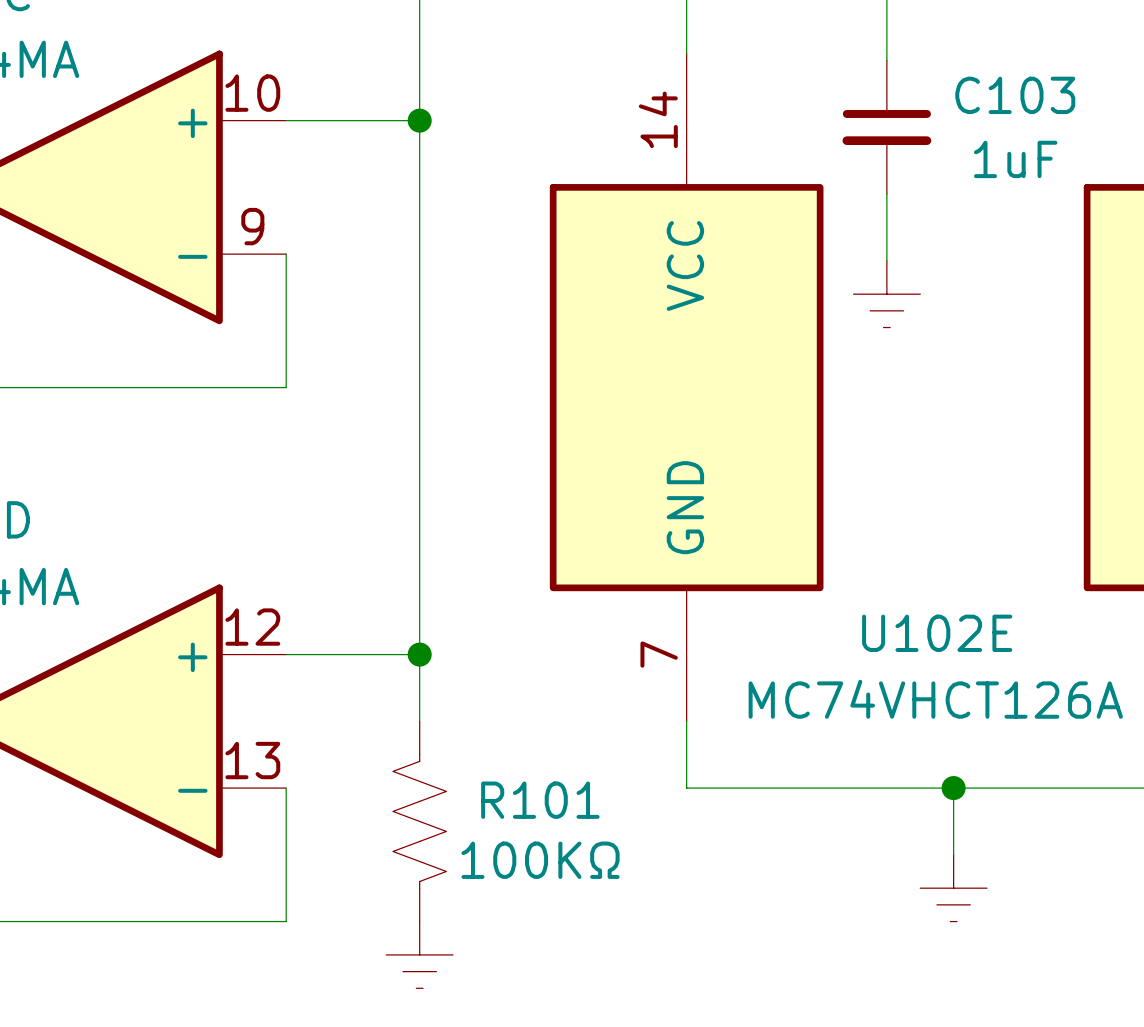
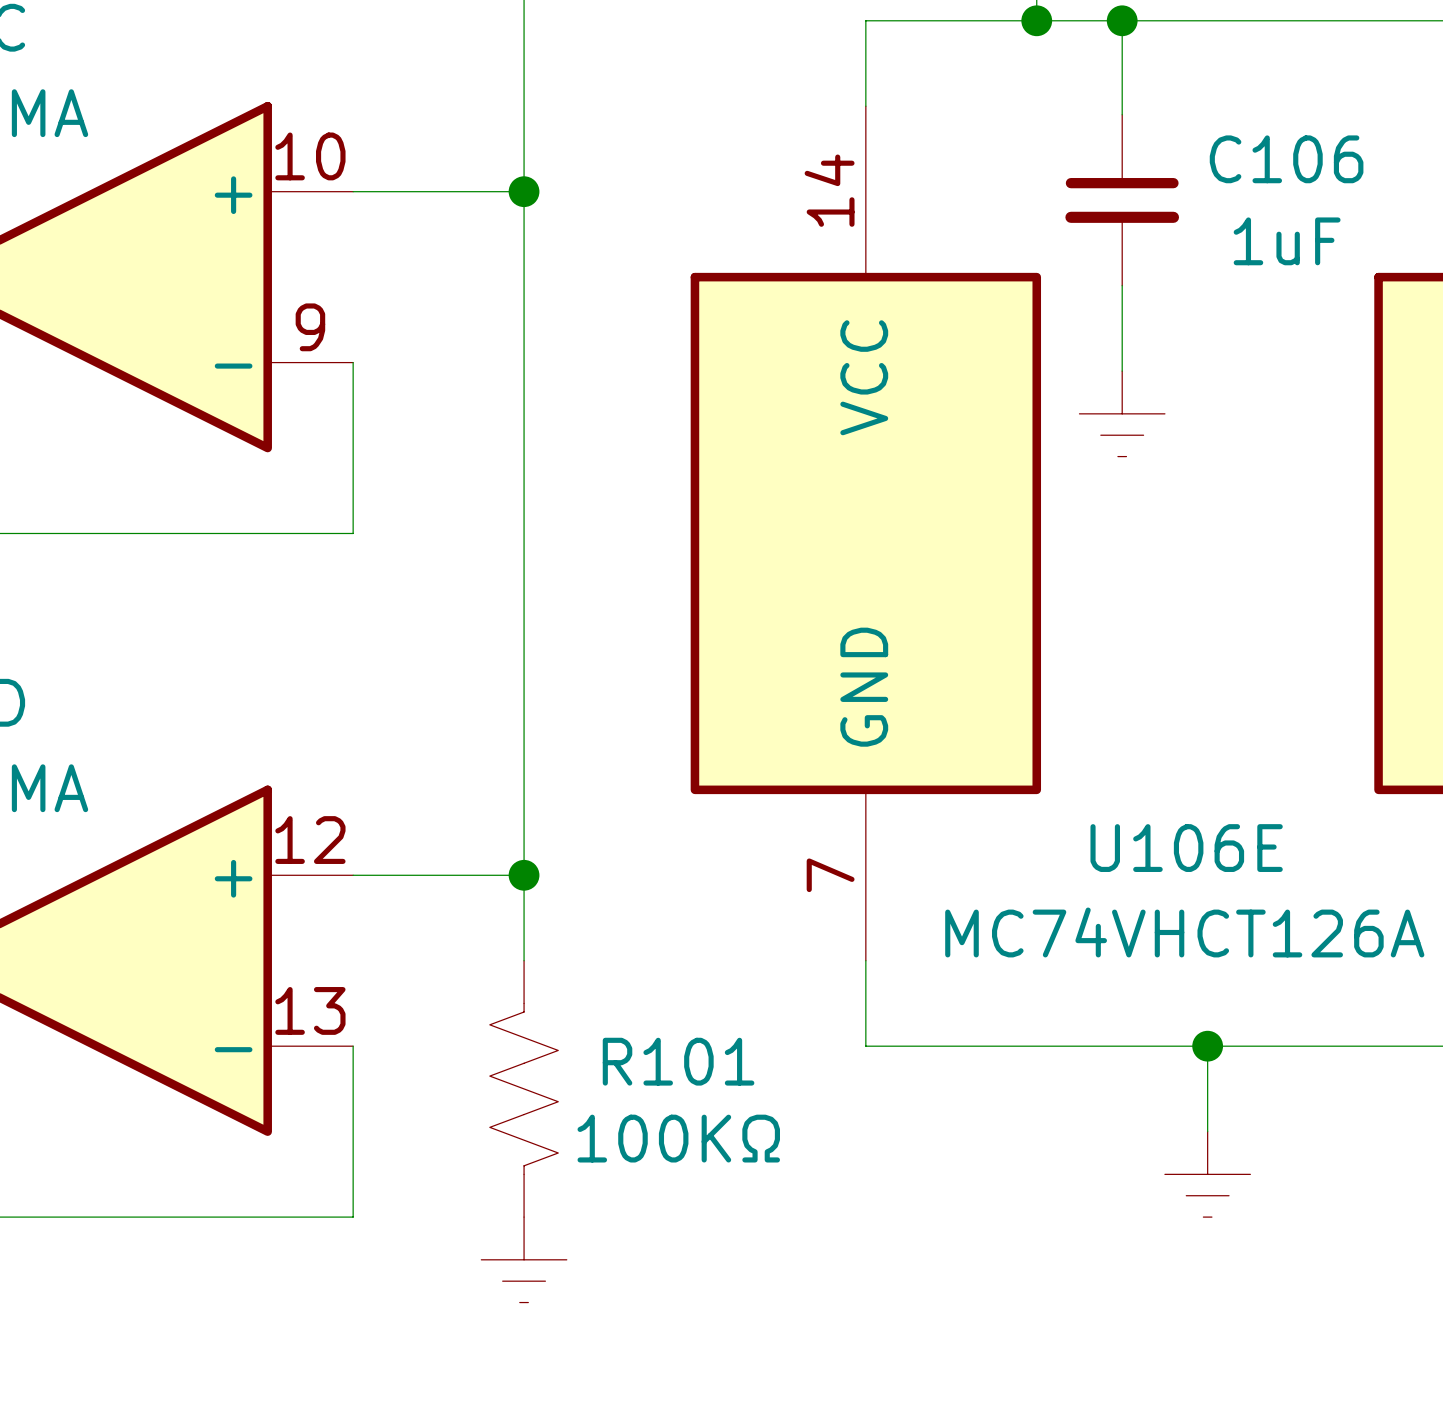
C103 name: C103 (1015, 95) -> C106 (1286, 159)
U102E name: U102E (937, 633) -> U106E (1186, 848)

